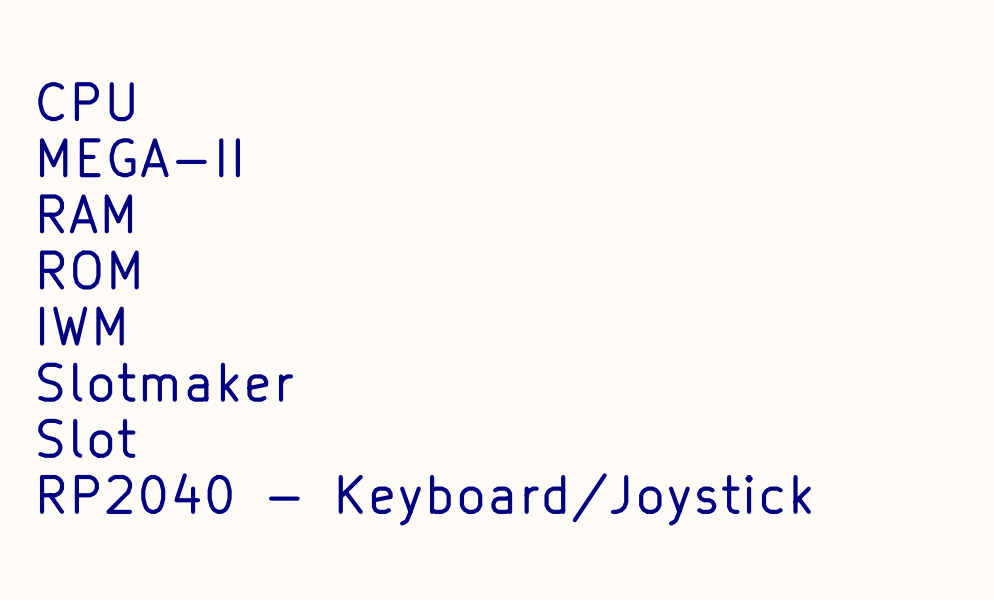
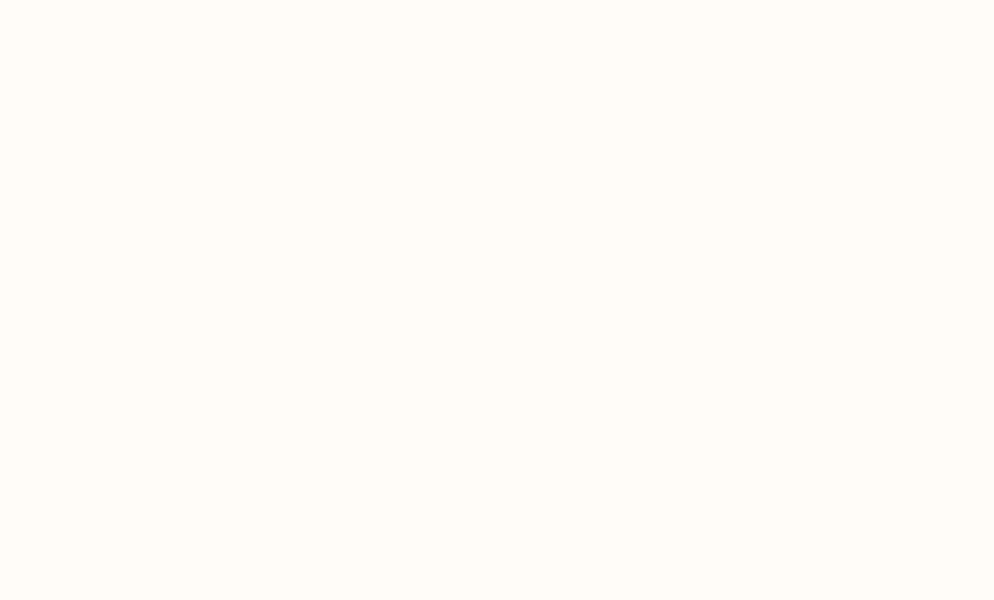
text: CPU (86, 101) -> none
text: MEGA-II (139, 157) -> none
text: RAM (86, 213) -> none
text: ROM (89, 269) -> none
text: IWM (81, 326) -> none
text: Slotmaker (165, 382) -> none
text: Slot (86, 438) -> none
text: RP2040 - Keyboard/Joystick (425, 499) -> none

